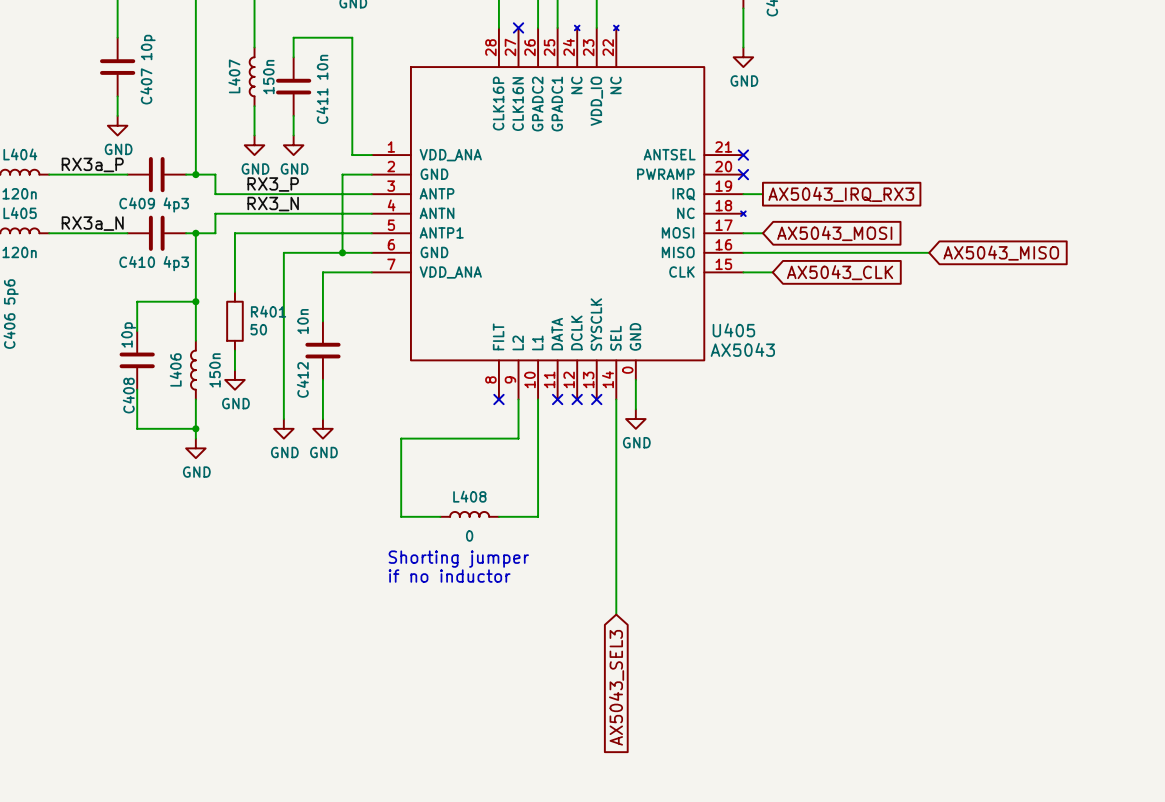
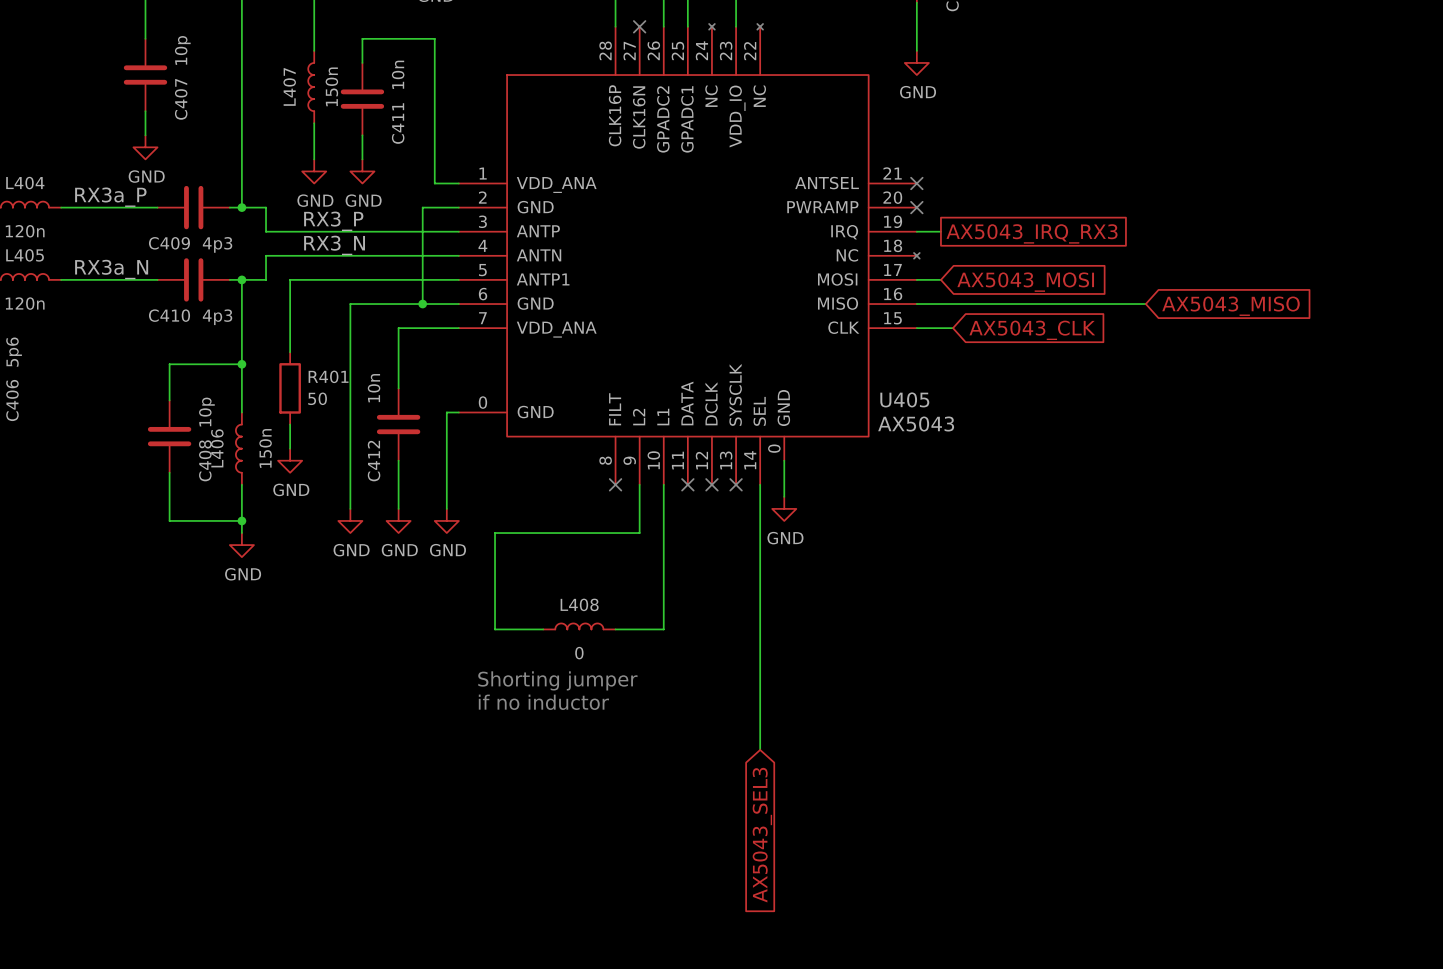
U405 symbol: [371, 25, 746, 400] -> [458, 23, 920, 485]
C408 value position: 10p (128, 334) -> 10p (206, 412)
wire: none -> (458, 412) (446, 412) (446, 508)
C408 name position: C408 (128, 395) -> C408 (205, 460)
power symbol: none -> GND (446, 520)

